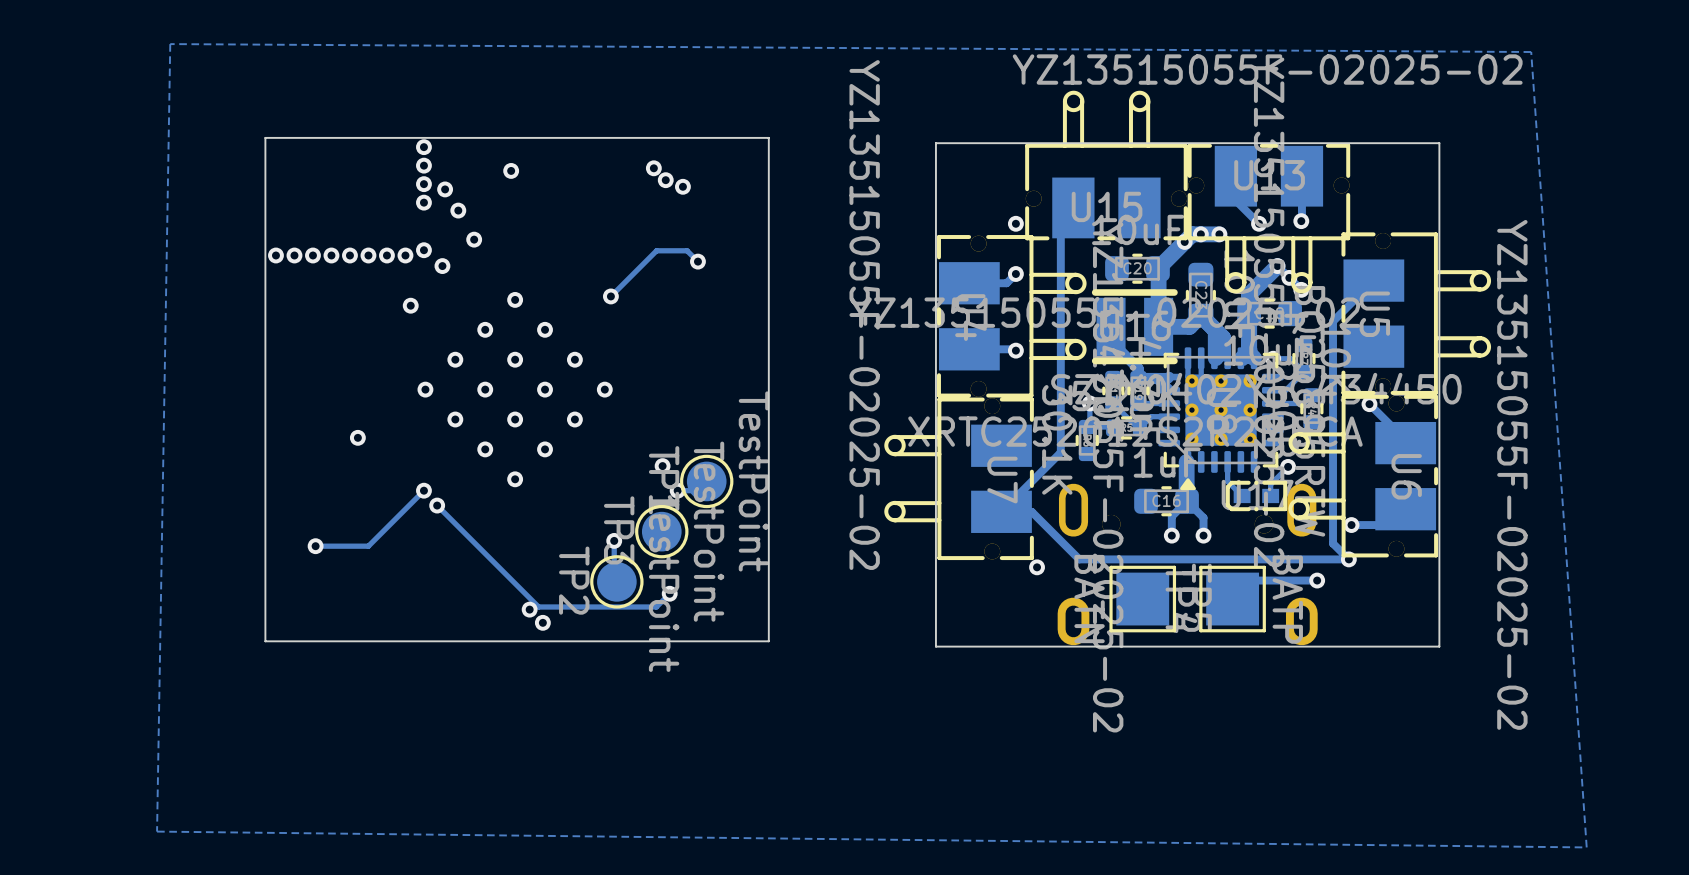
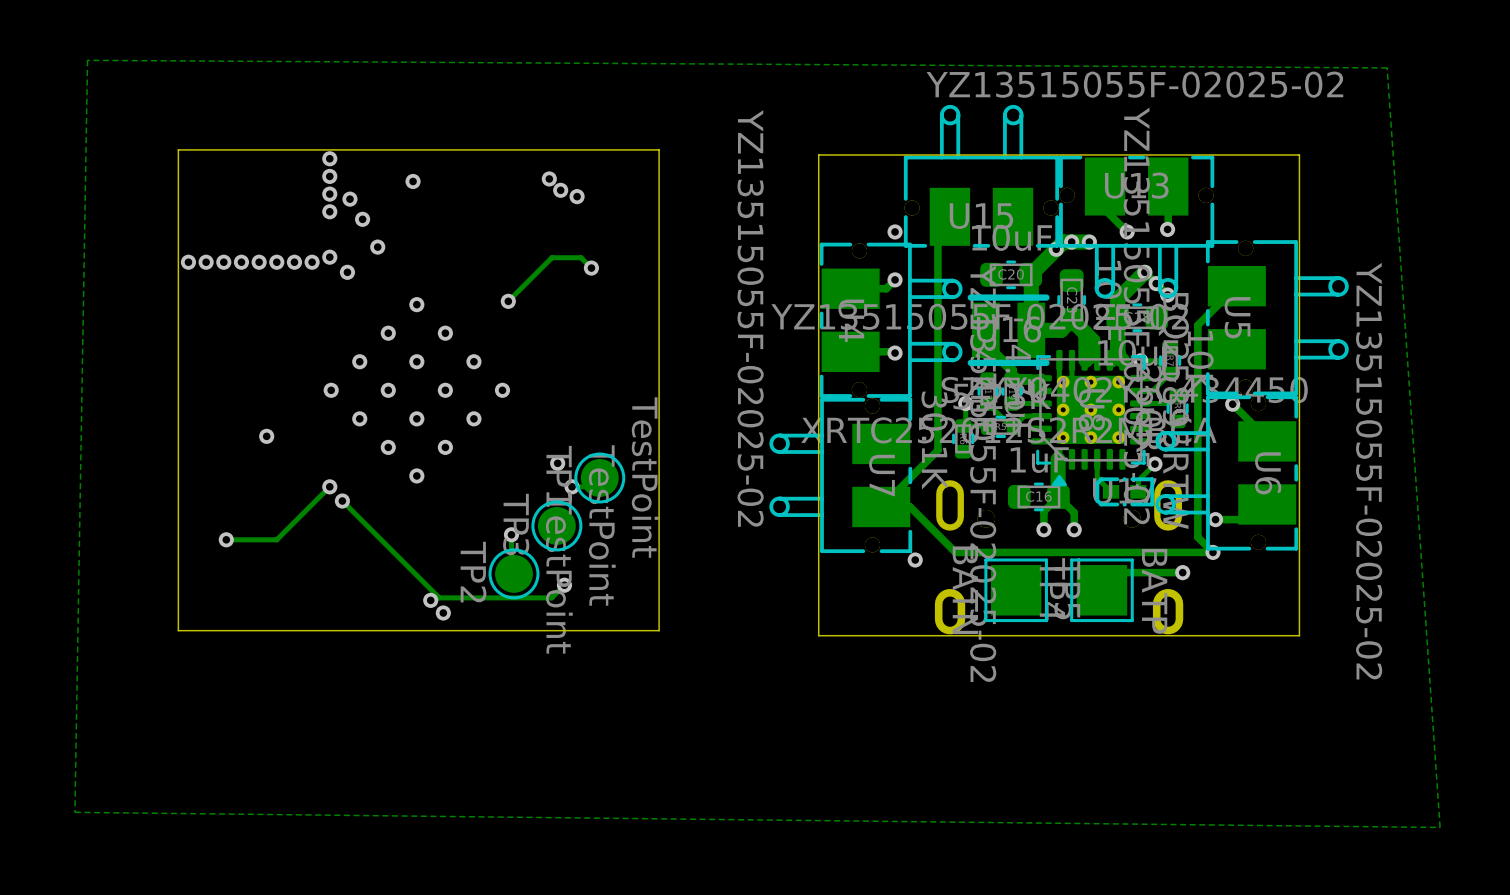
via: (410, 305) -> none

